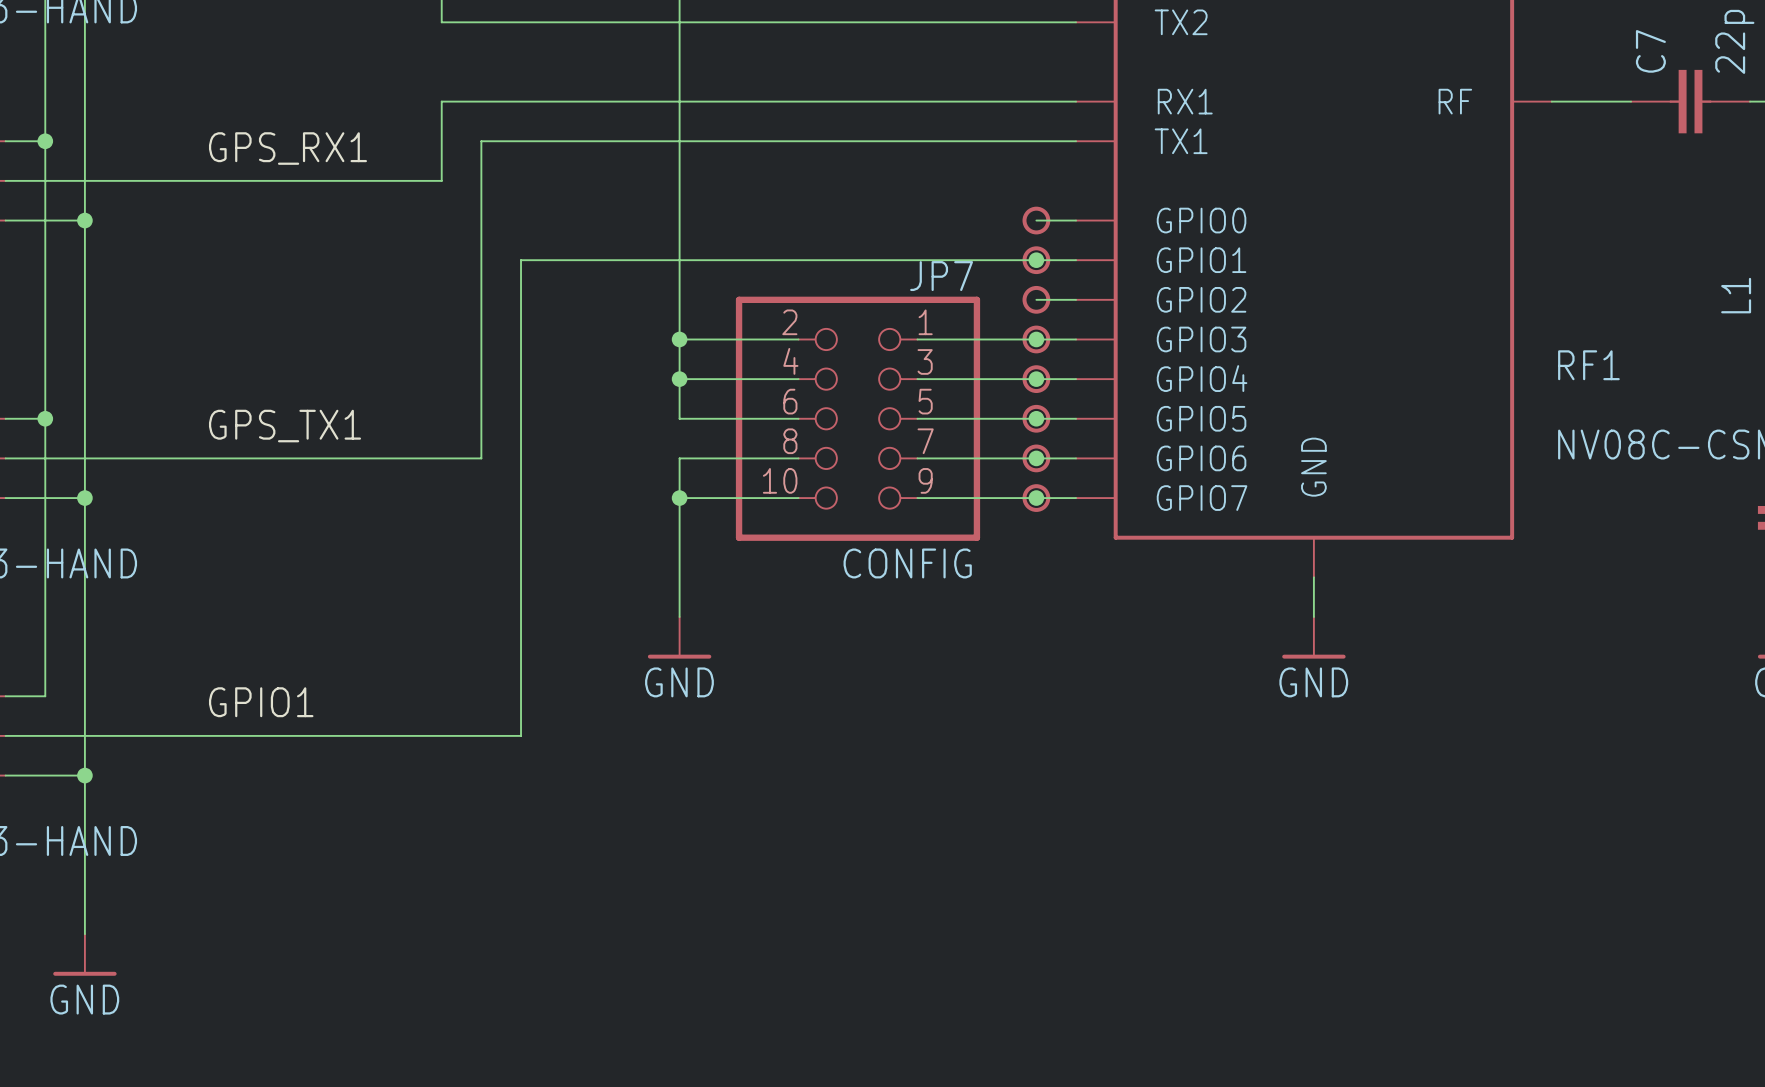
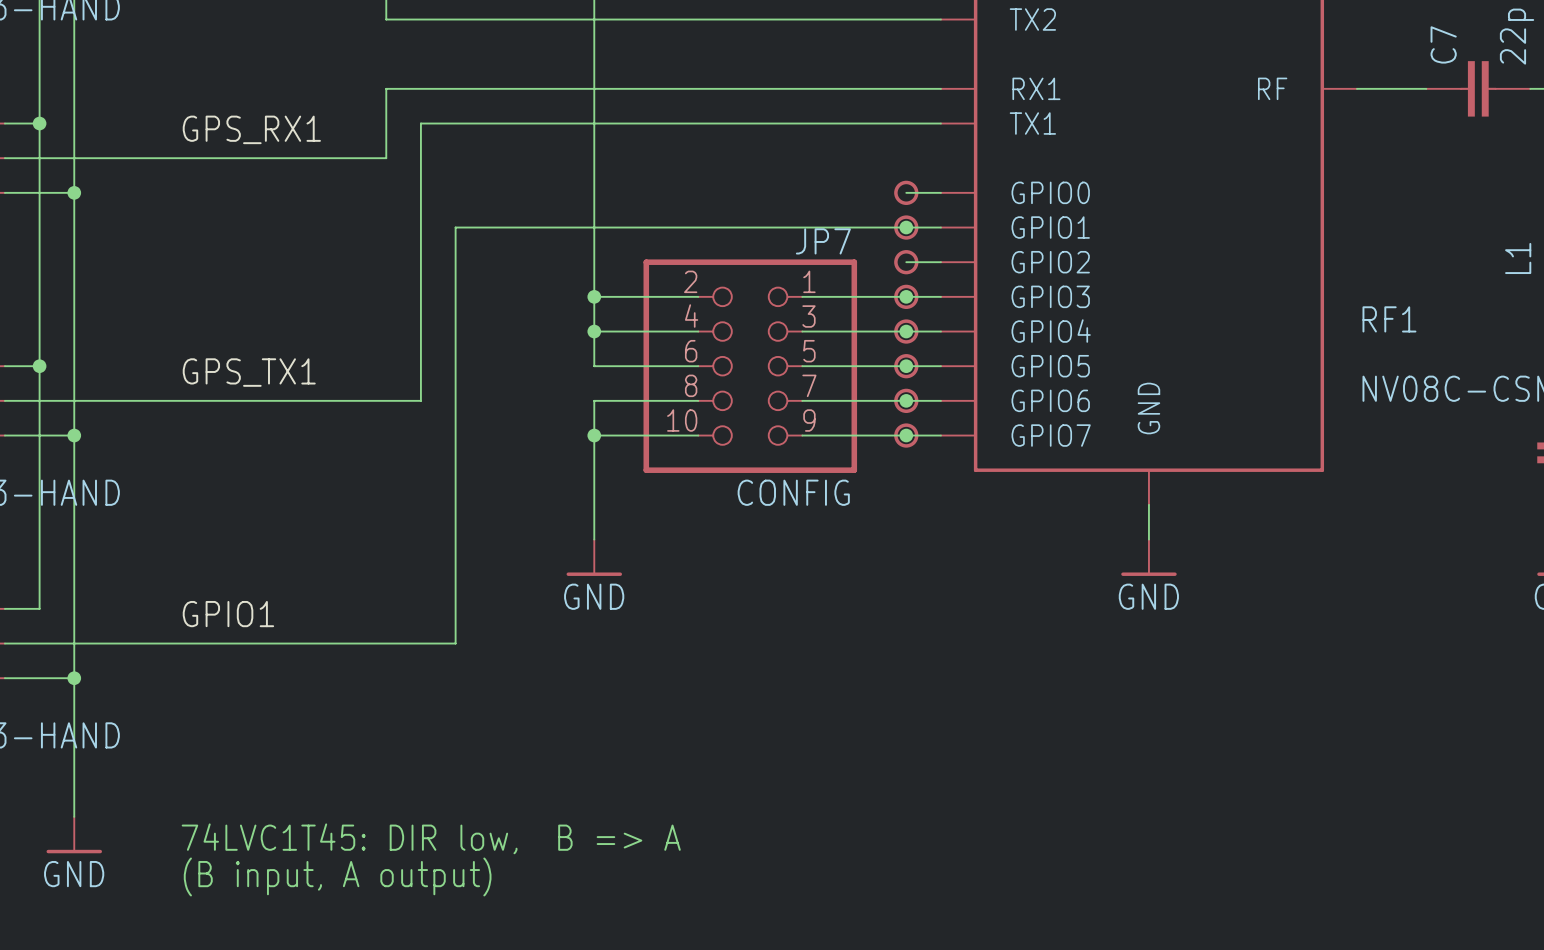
text: none -> 74LVC1T45: DIR low, B => A (431, 838)
text: none -> (B input, A output) (337, 876)

